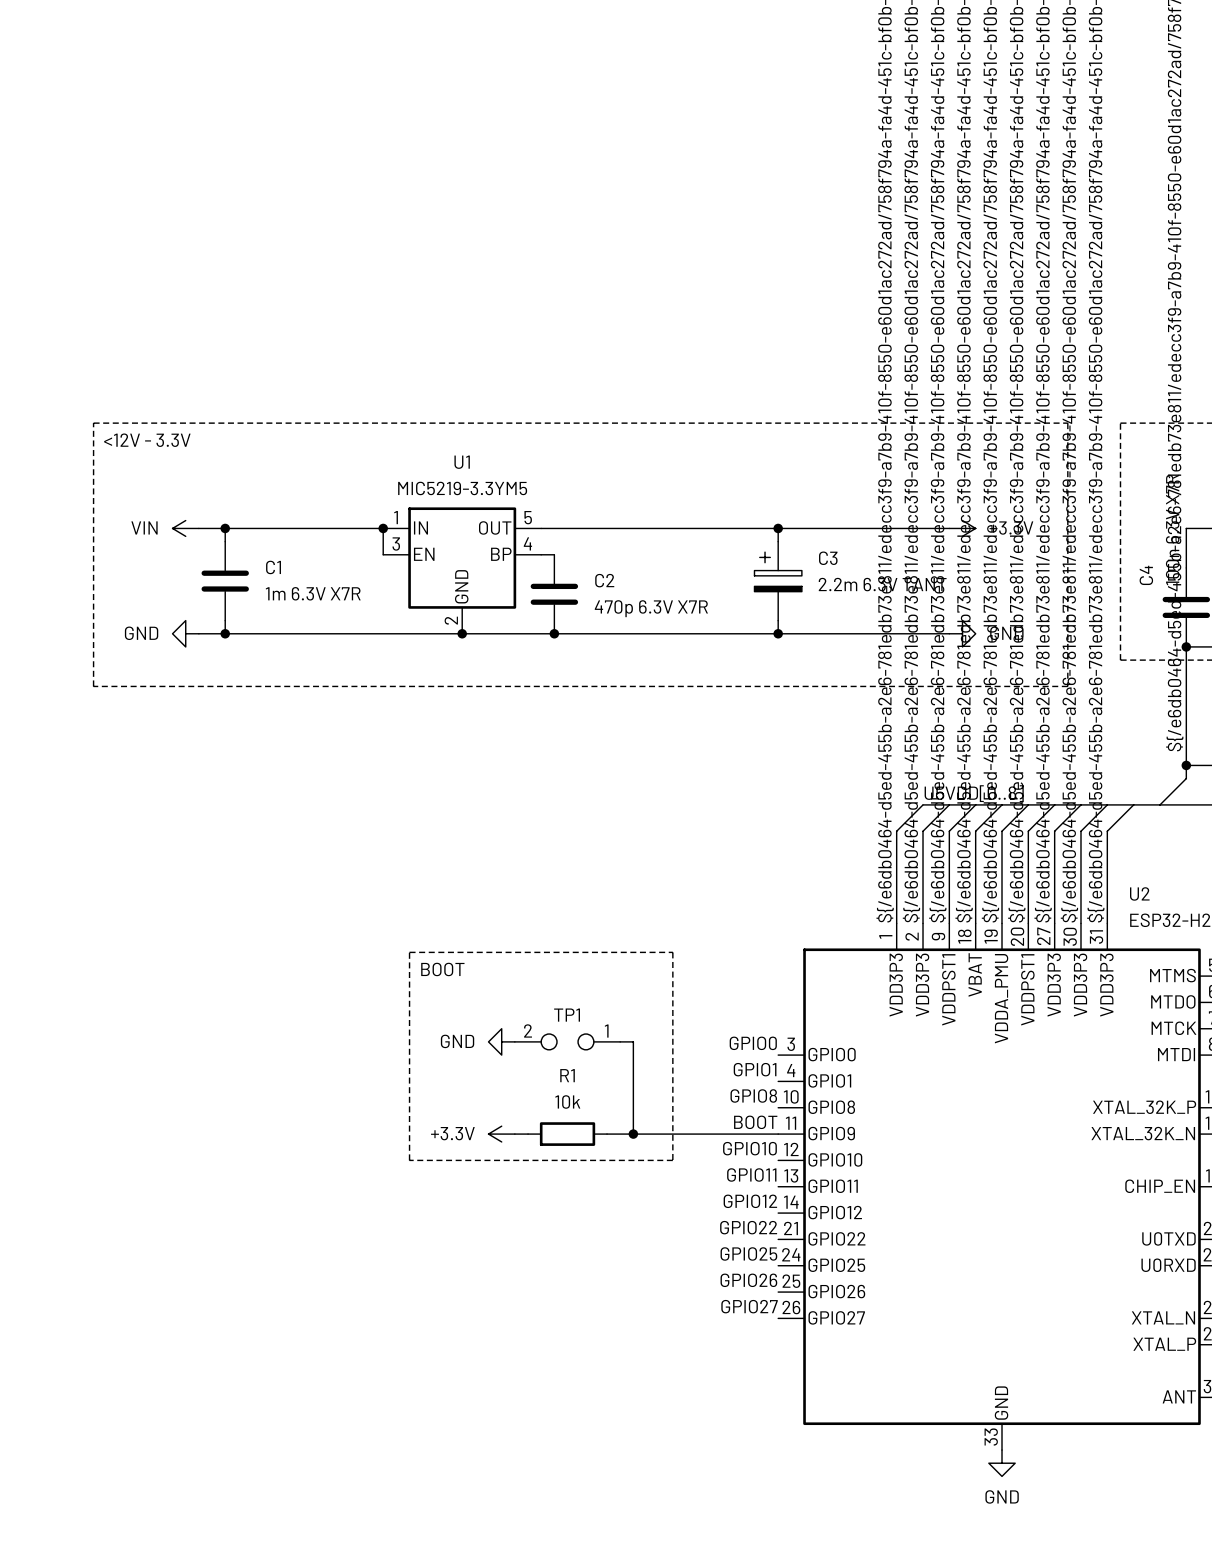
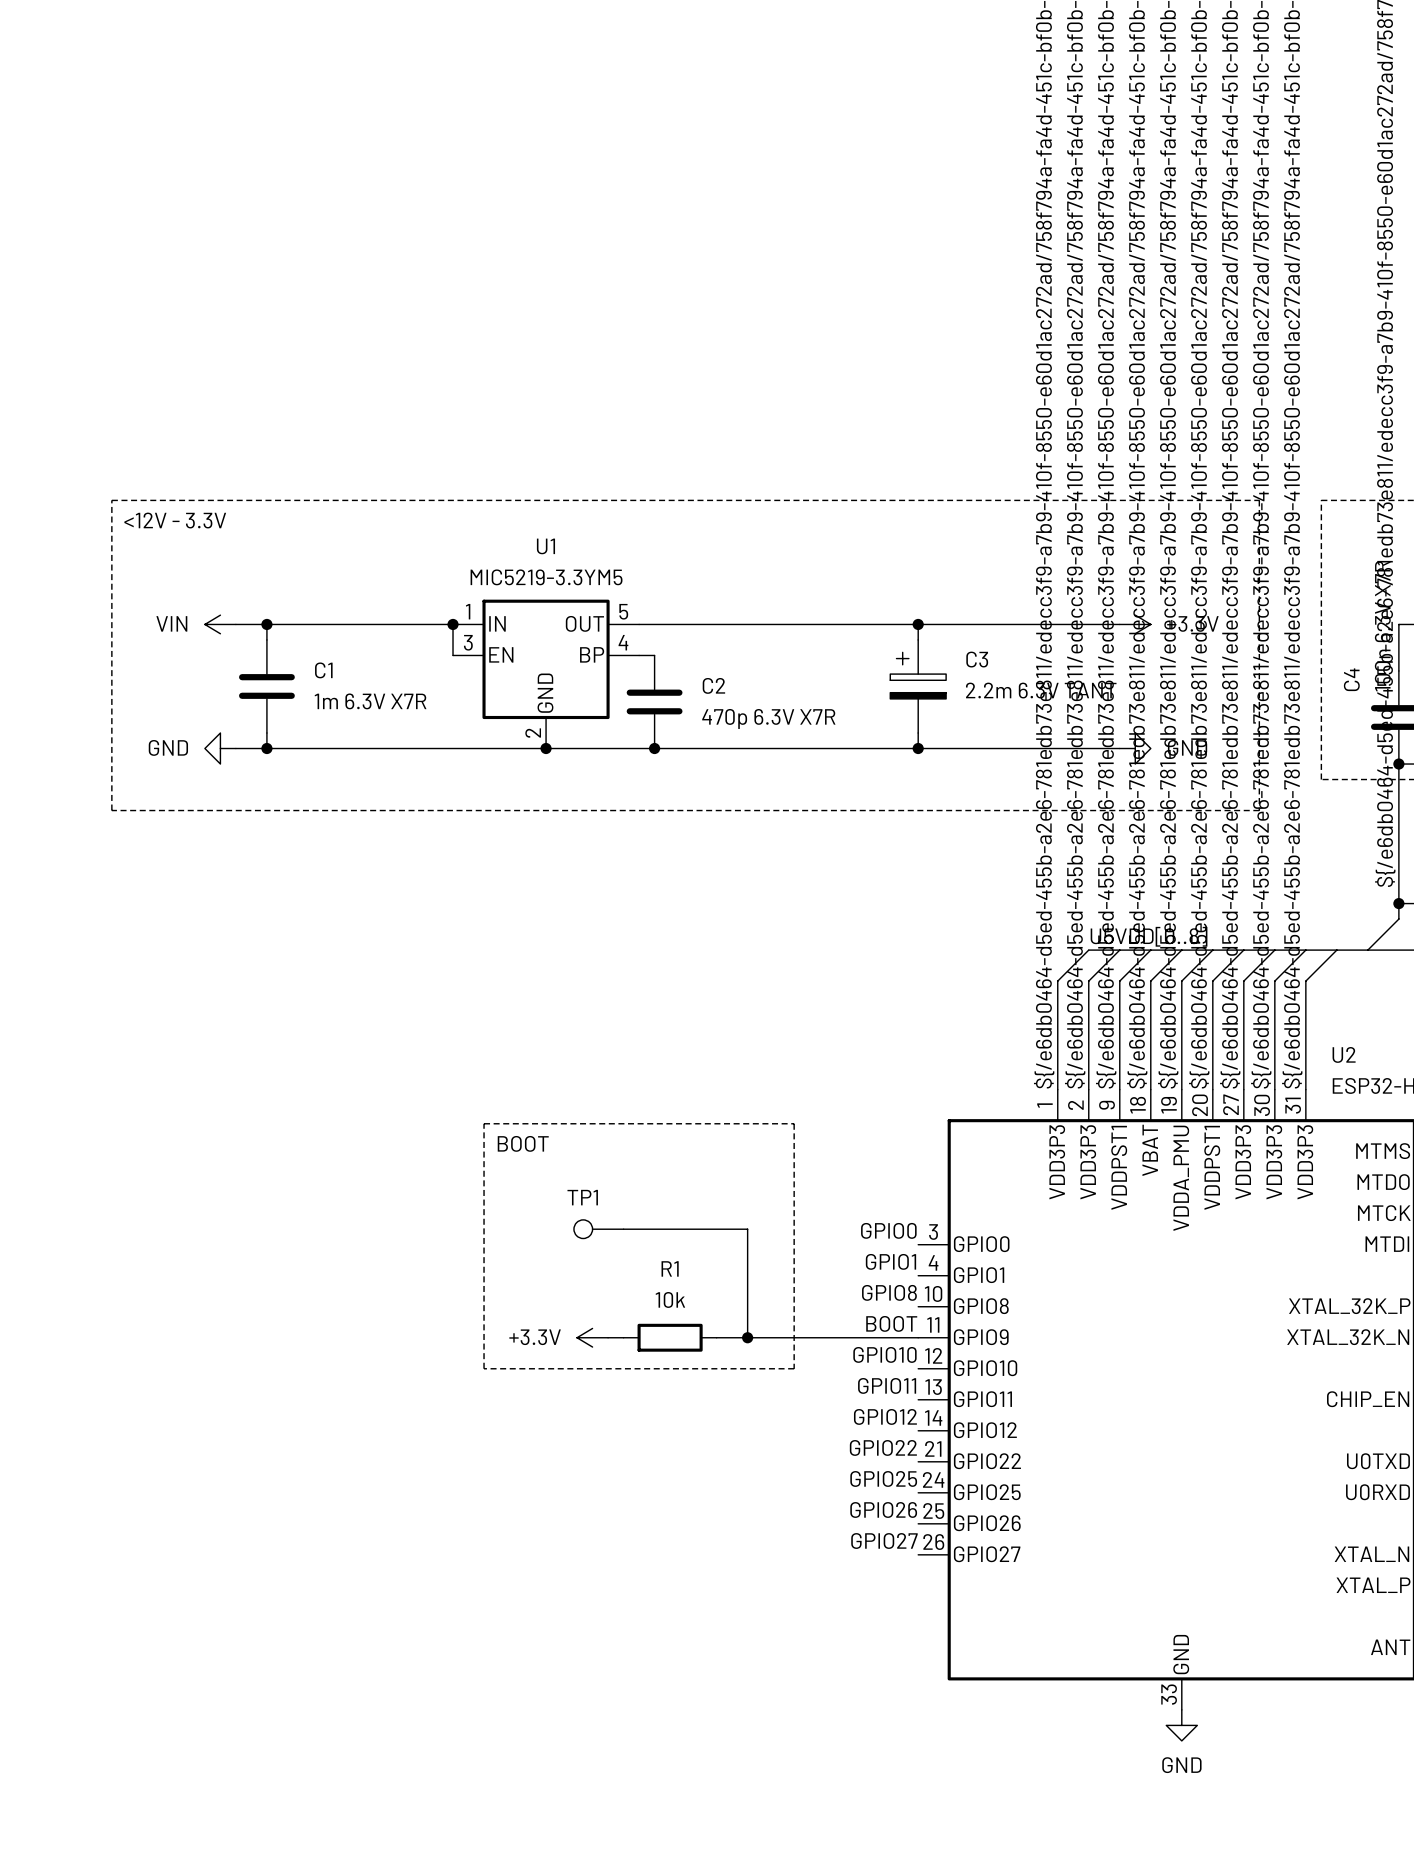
TP1 symbol: [514, 1034, 621, 1050] -> [573, 1219, 624, 1239]
power symbol: GND (501, 1041) -> none
wire: none -> (623, 1229) (732, 1229)

